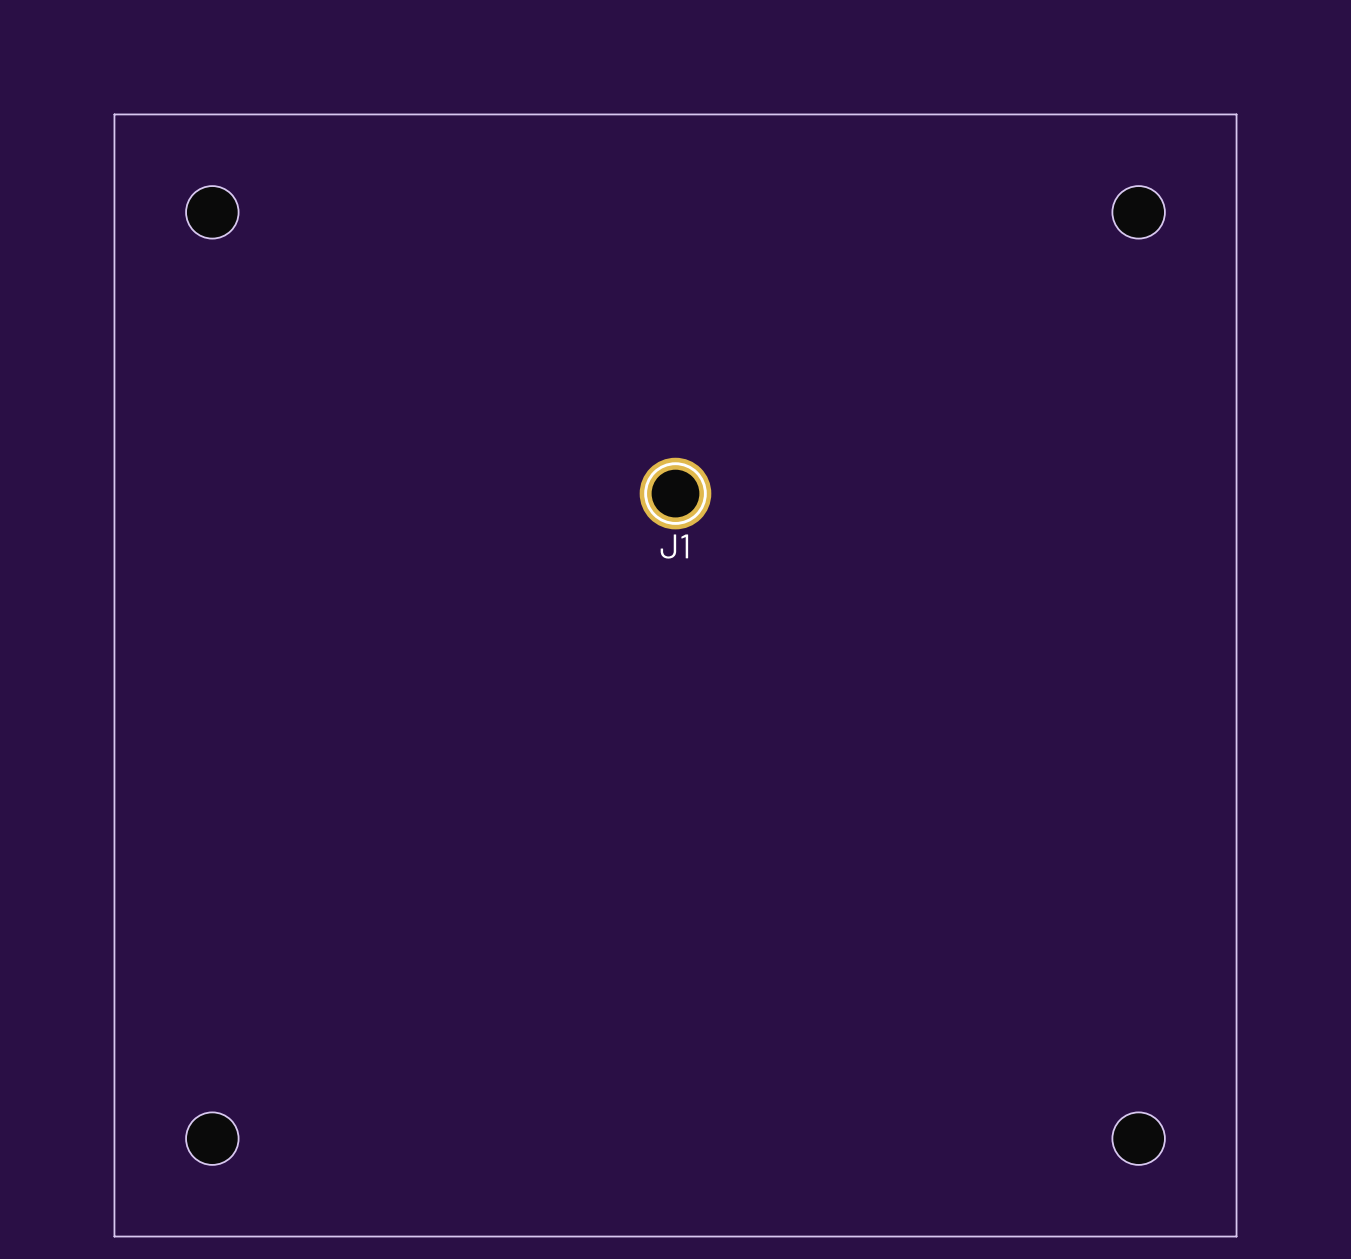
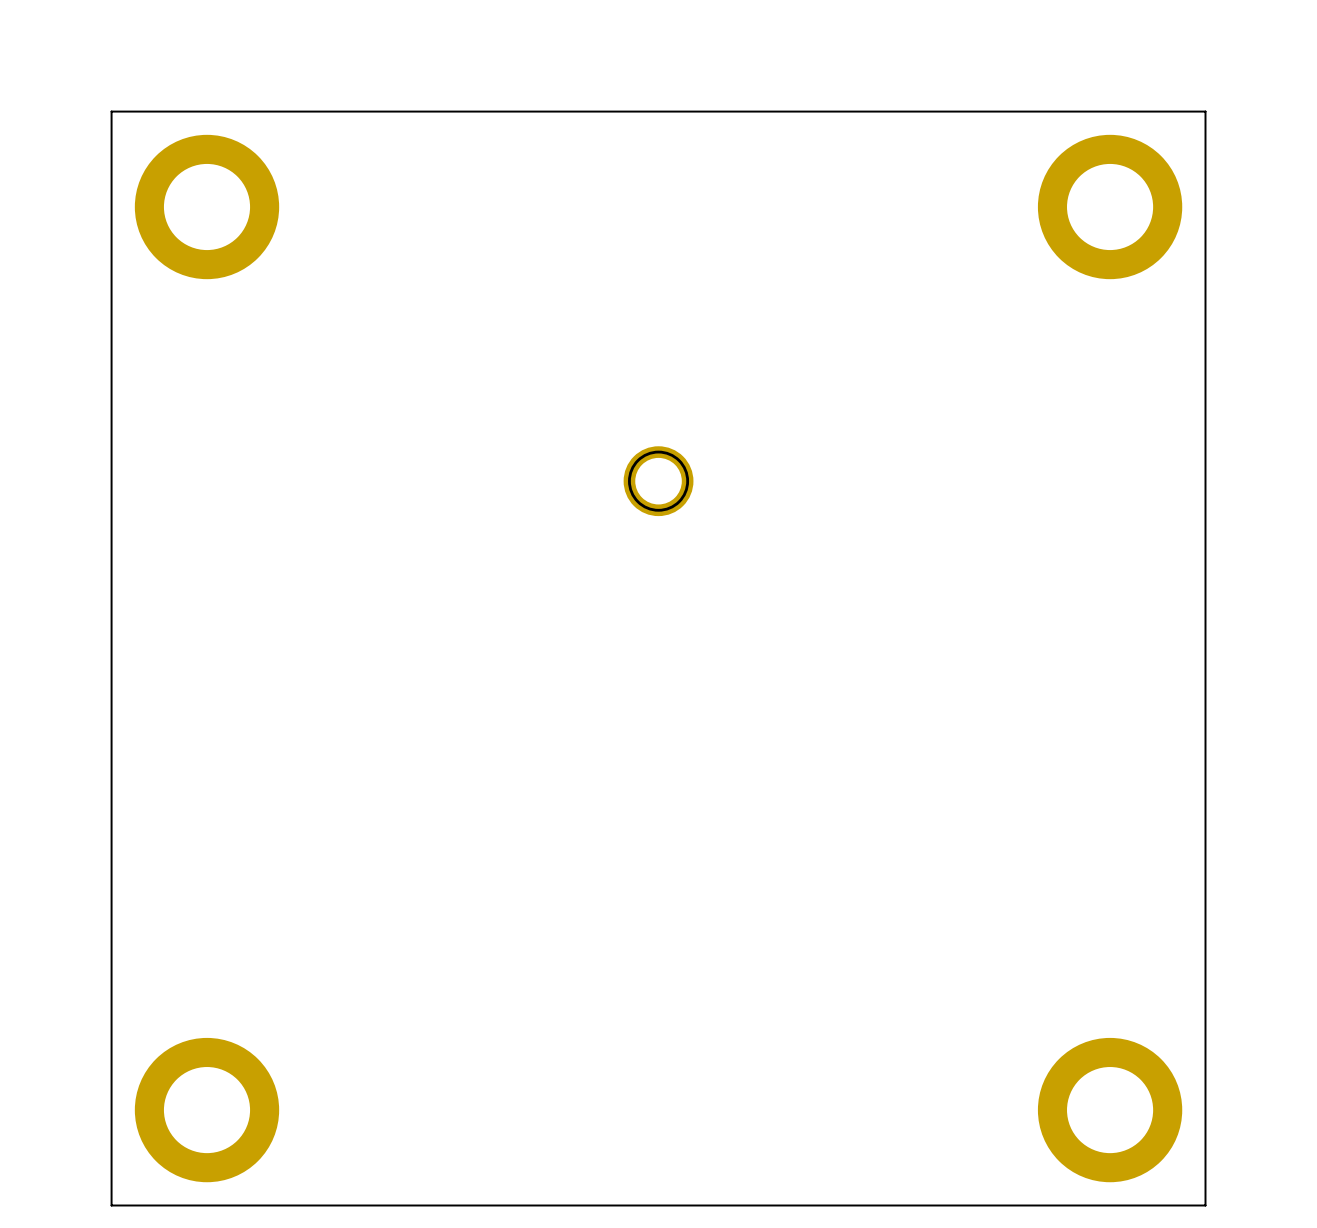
part footprint: [186, 186, 239, 239] -> [134, 134, 280, 280]
part footprint: [1112, 186, 1165, 239] -> [1037, 134, 1183, 280]
J1 name: J1 (674, 546) -> none
part footprint: [186, 1112, 239, 1165] -> [134, 1037, 280, 1183]
part footprint: [1112, 1112, 1165, 1165] -> [1037, 1037, 1183, 1183]

